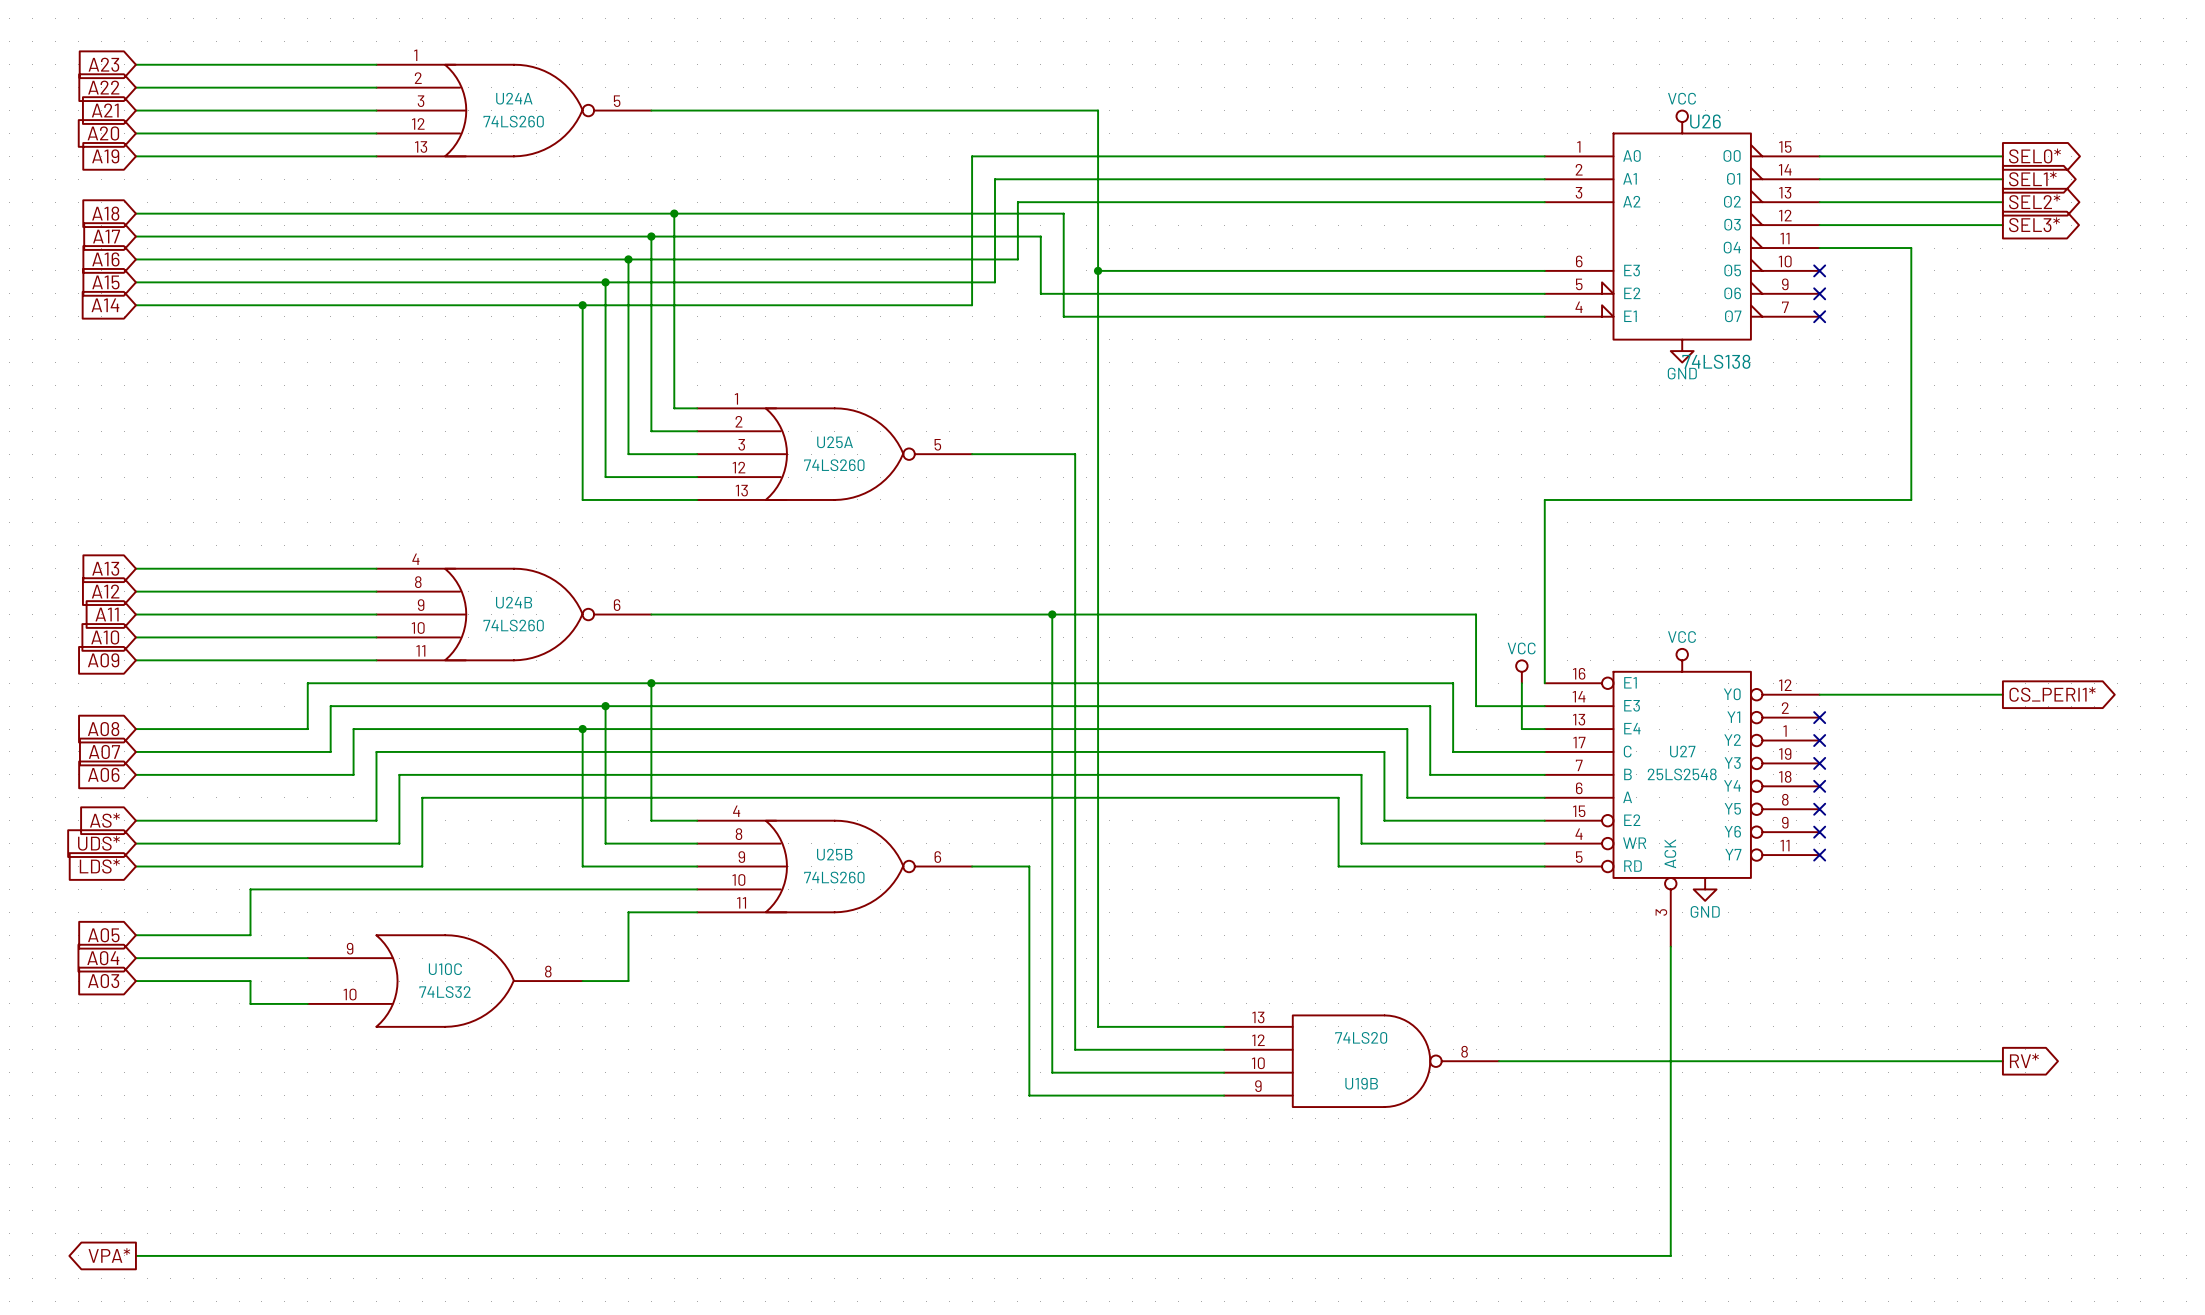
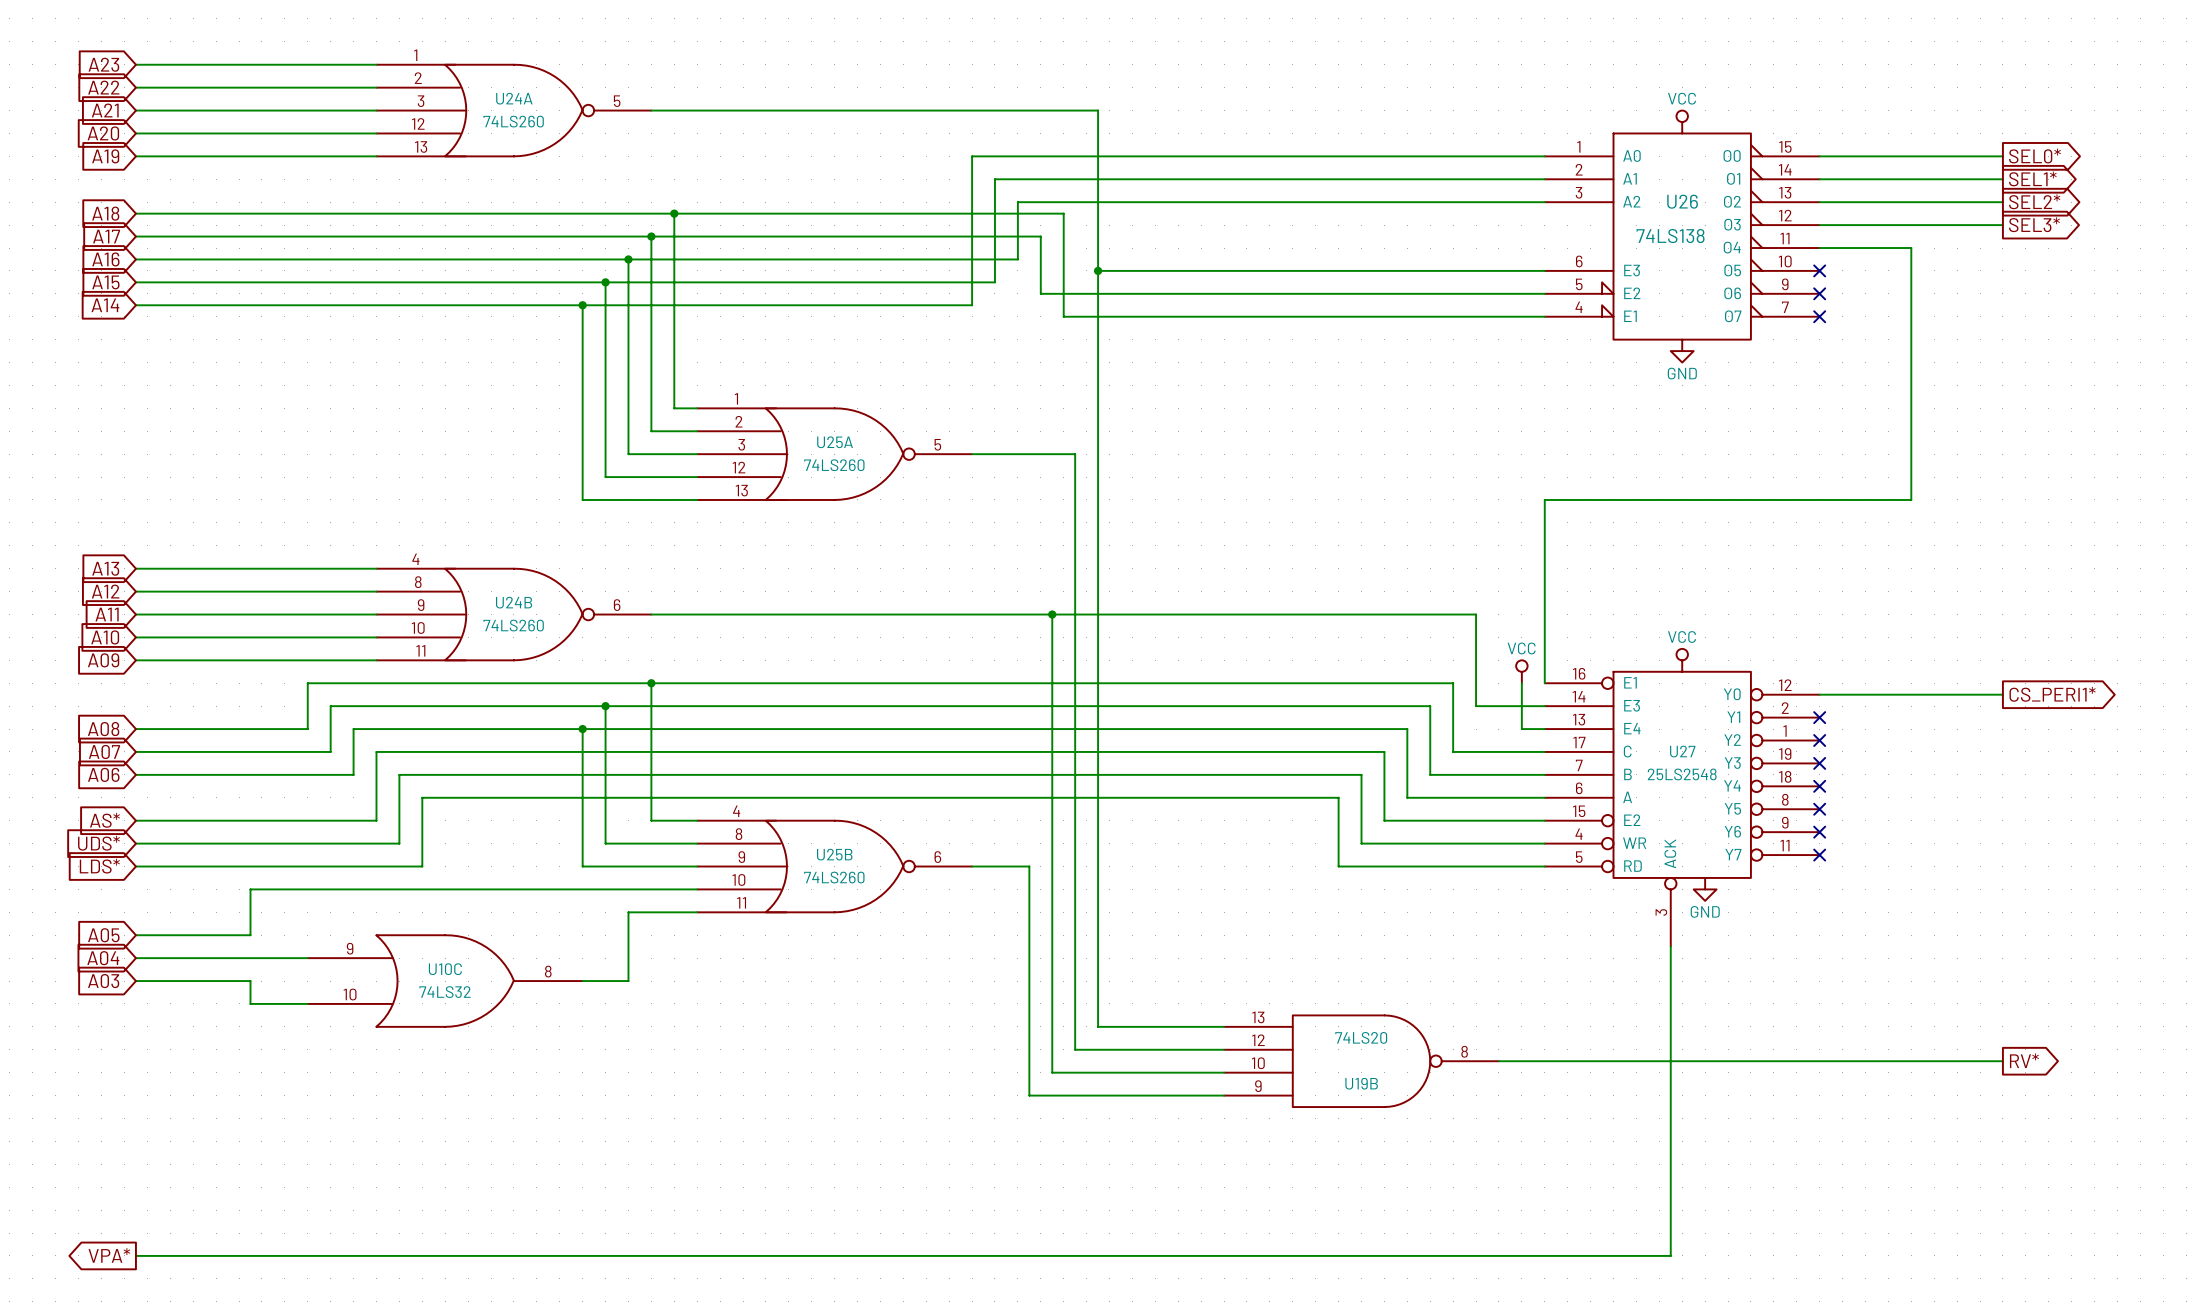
U26 name position: U26 (1705, 121) -> U26 (1682, 201)
U26 value position: 74LS138 (1716, 361) -> 74LS138 (1670, 236)

